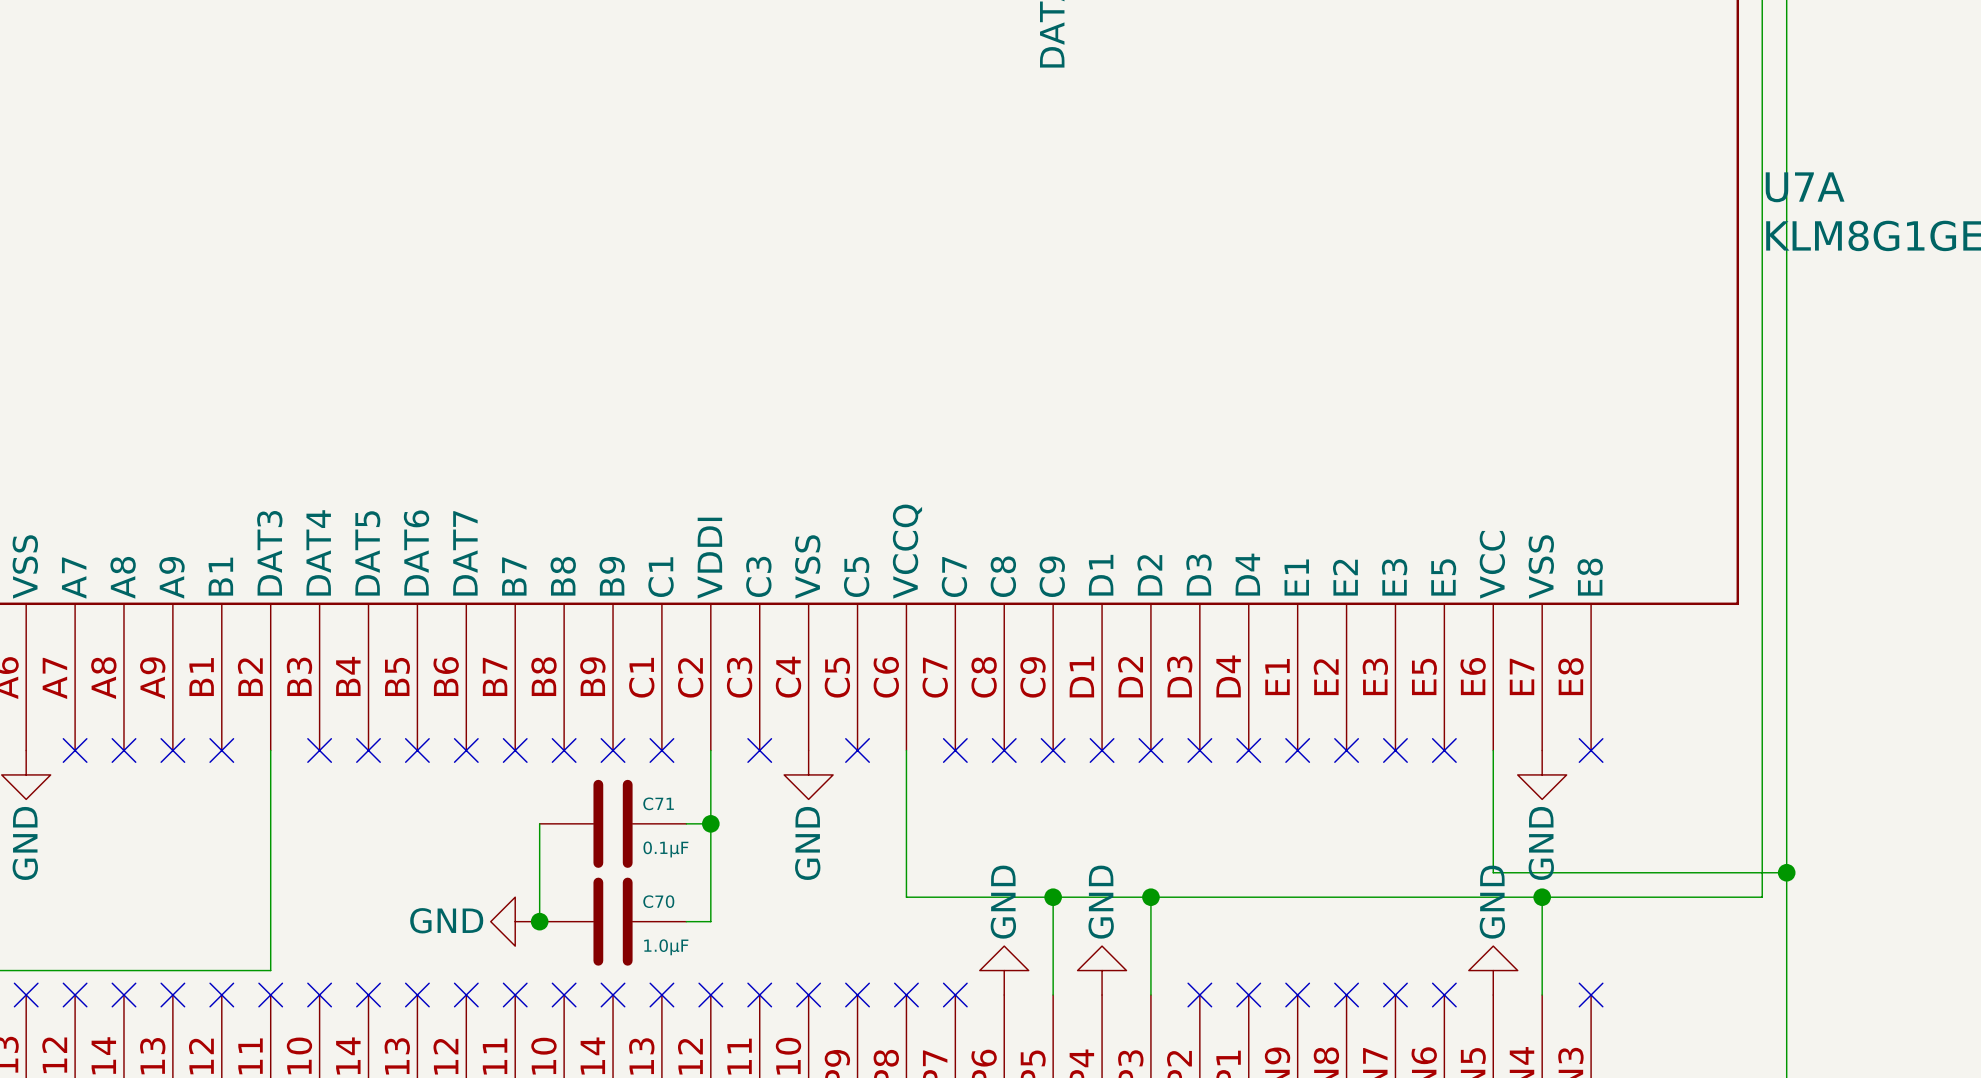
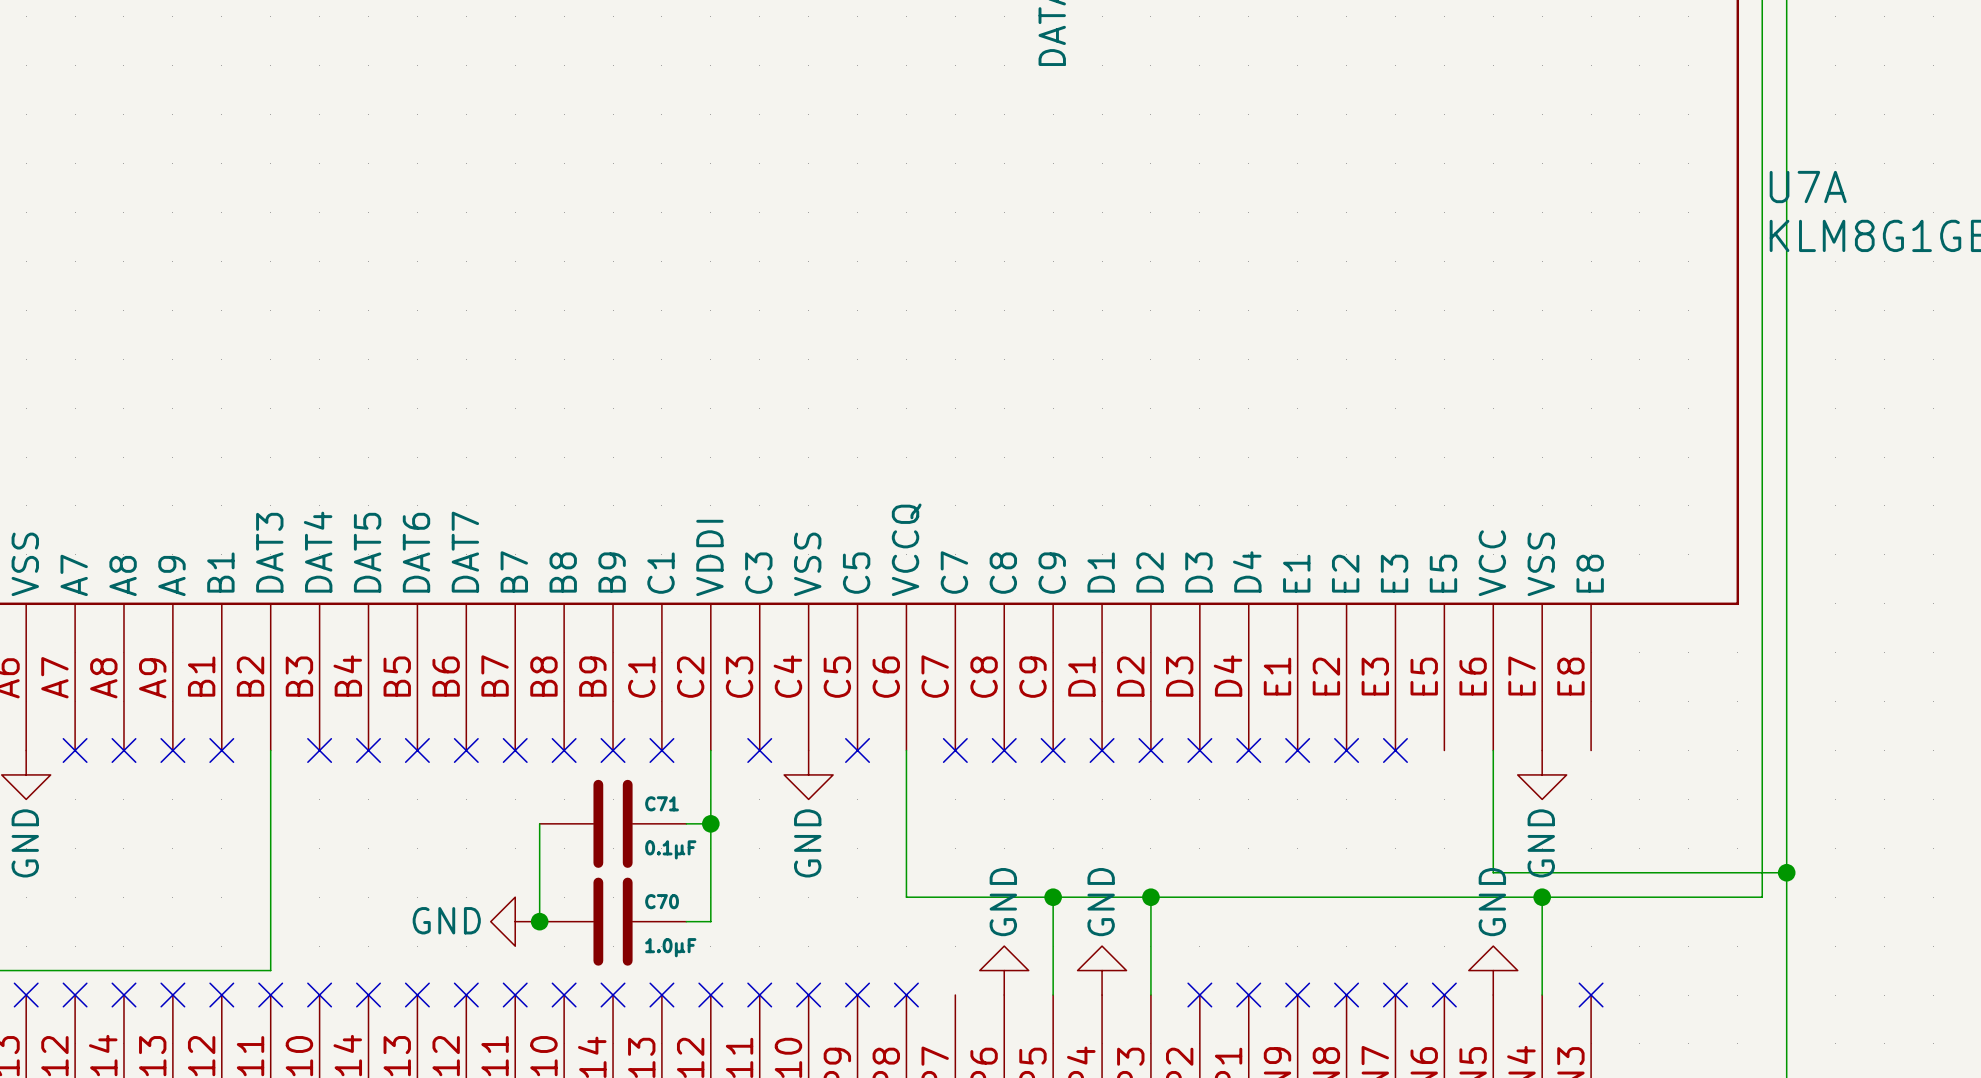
no-connect mark: (1444, 750) -> none
no-connect mark: (1591, 750) -> none
no-connect mark: (955, 995) -> none

